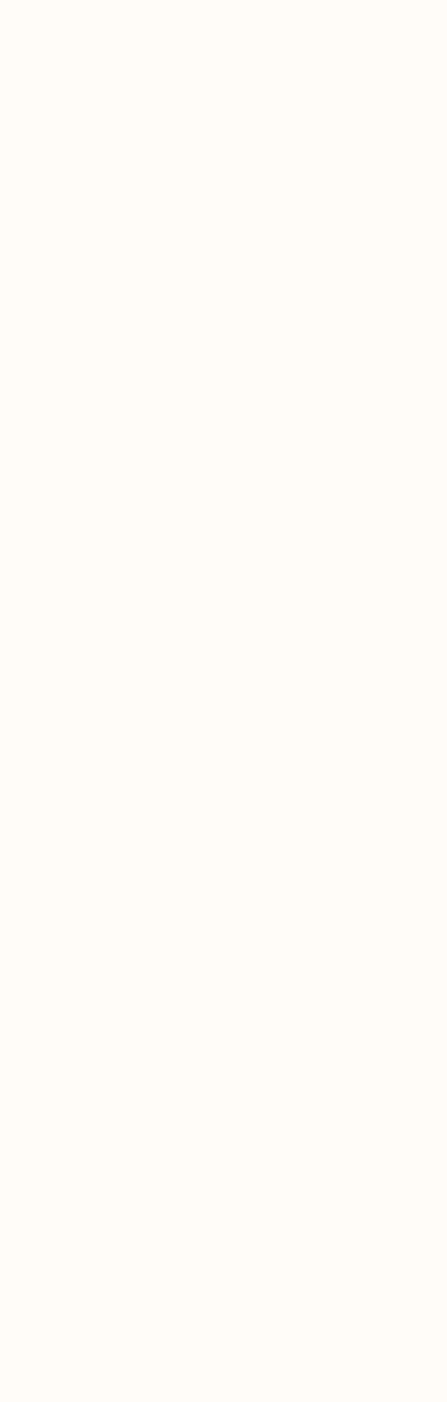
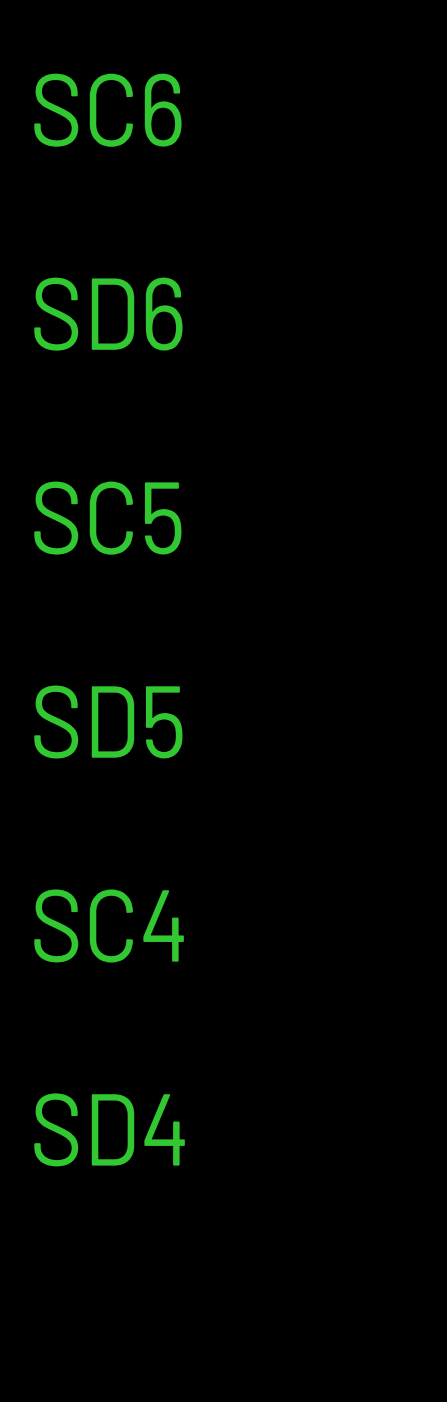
text: none -> SC6 (107, 110)
text: none -> SD6 (108, 314)
text: none -> SC5 (107, 518)
text: none -> SD5 (108, 722)
text: none -> SC4 (109, 926)
text: none -> SD4 (109, 1129)

